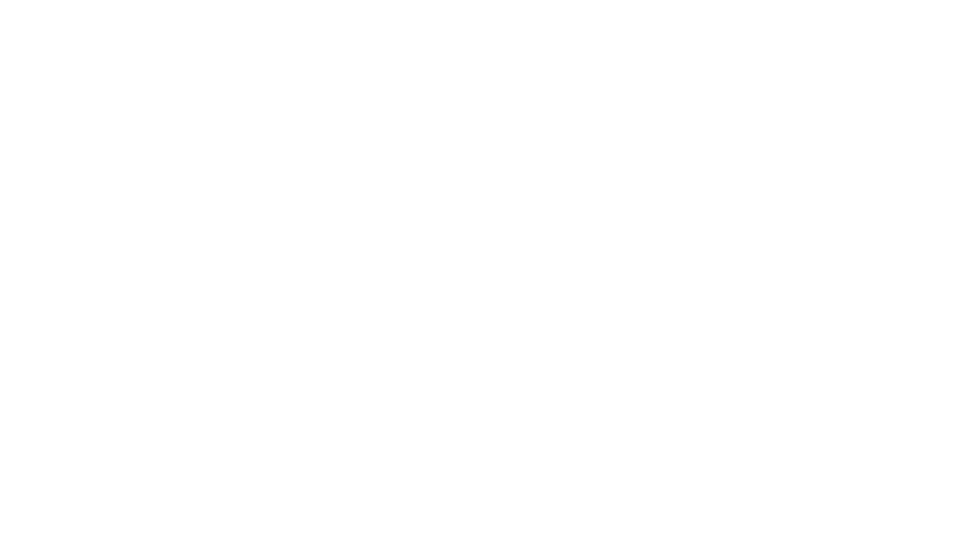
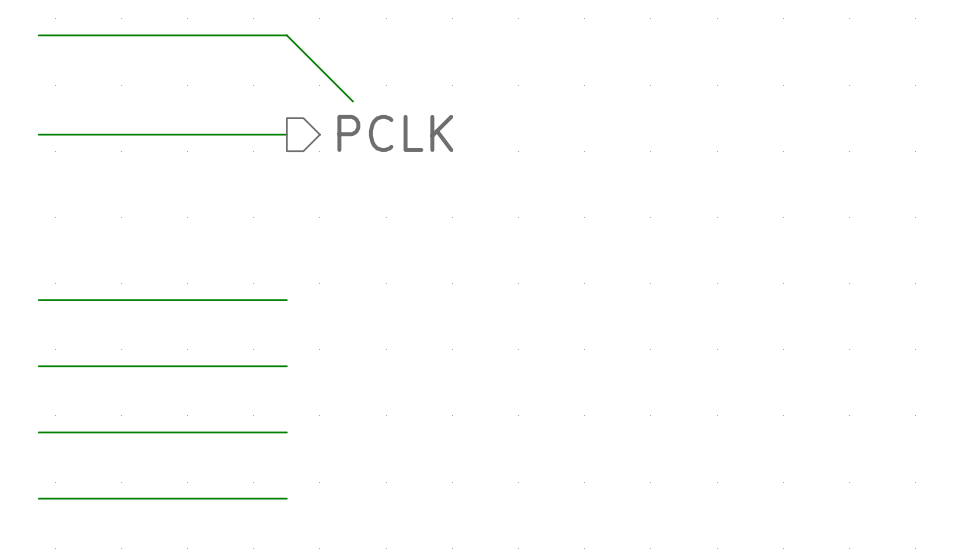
wire: none -> (38, 35) (286, 35) (353, 101)
hierarchical label: none -> PCLK (395, 133)
wire: none -> (38, 134) (286, 134)
wire: none -> (38, 300) (286, 300)
wire: none -> (38, 366) (286, 366)
wire: none -> (38, 432) (286, 432)
wire: none -> (38, 498) (286, 498)

